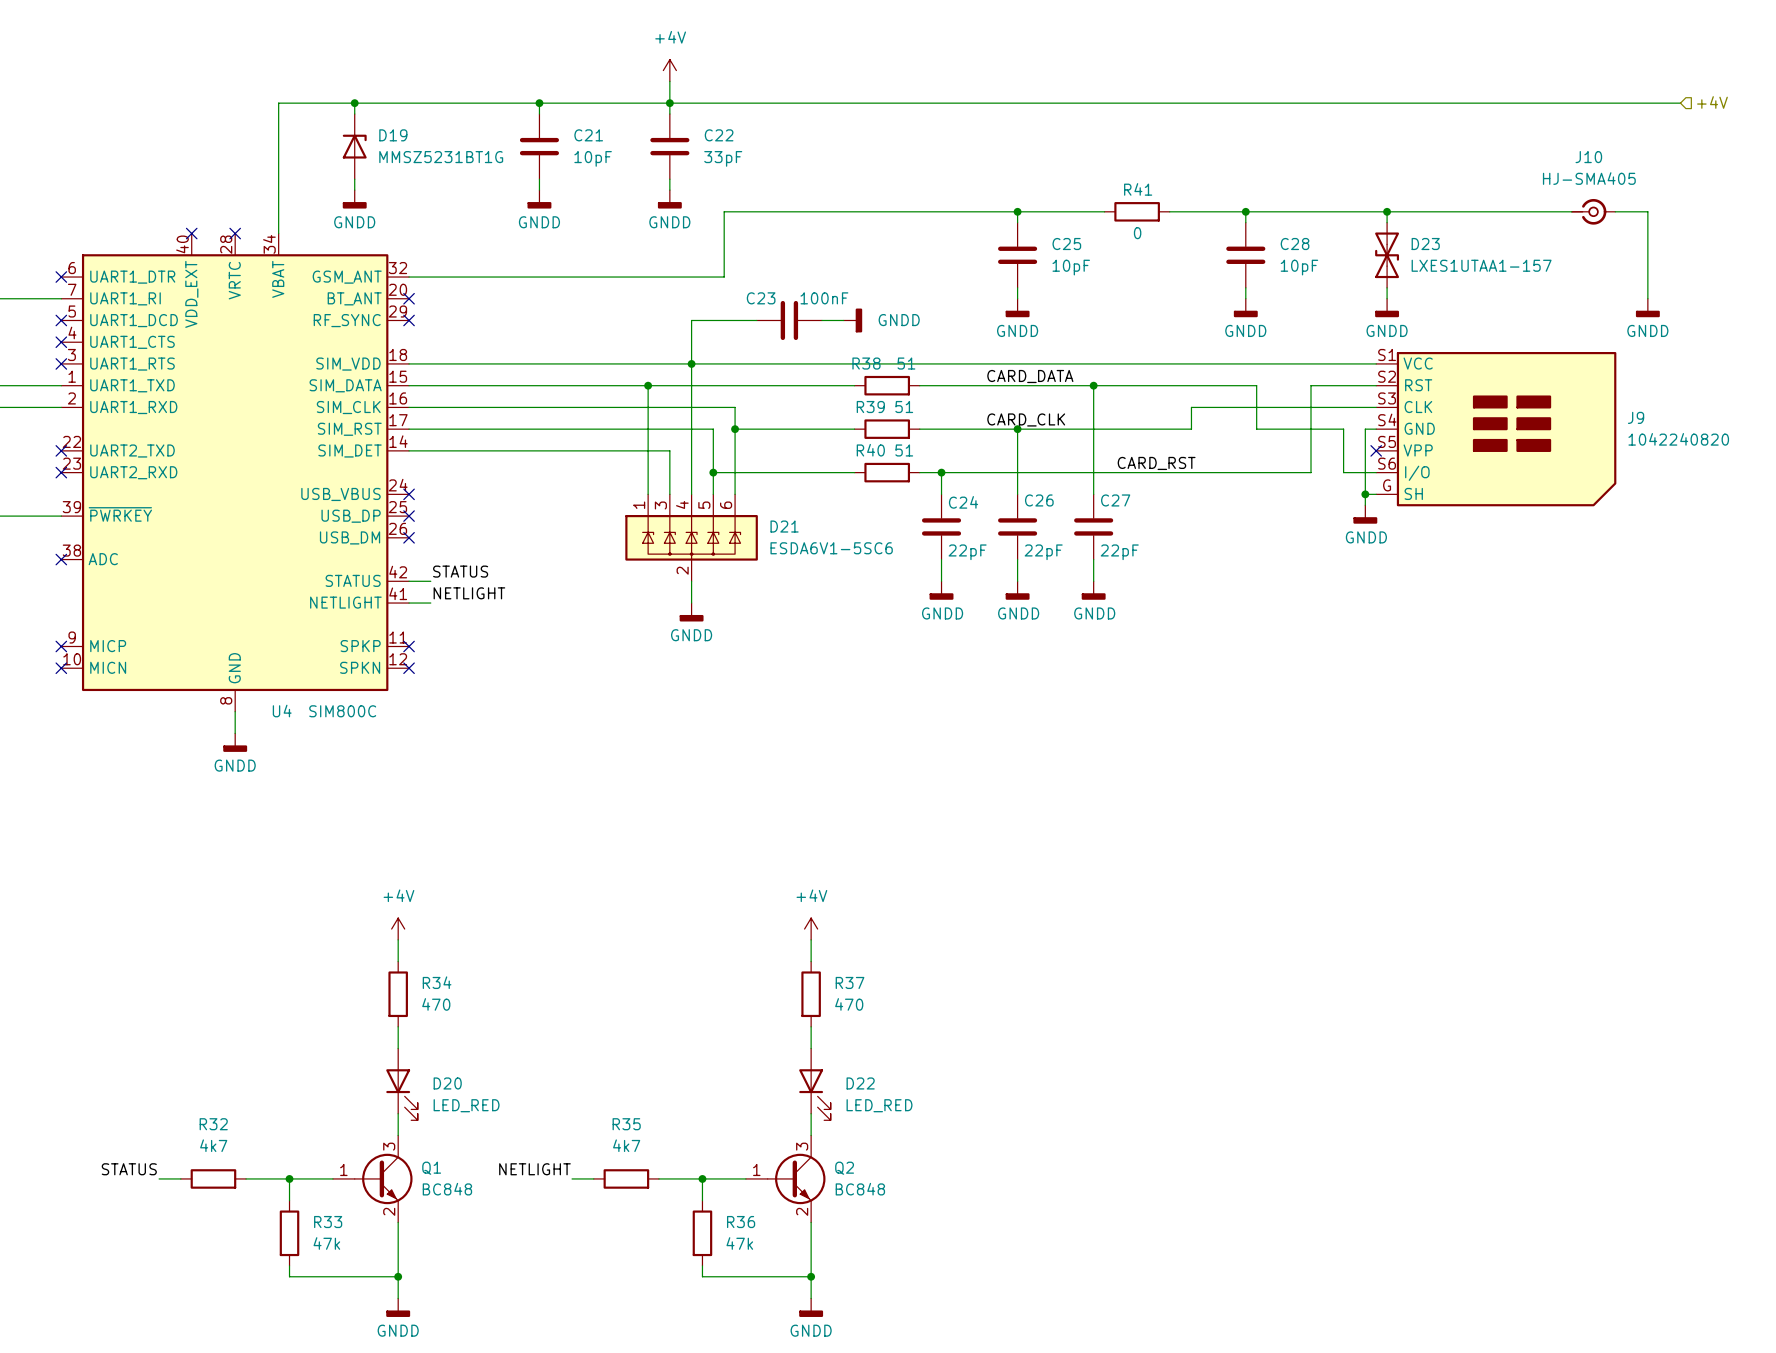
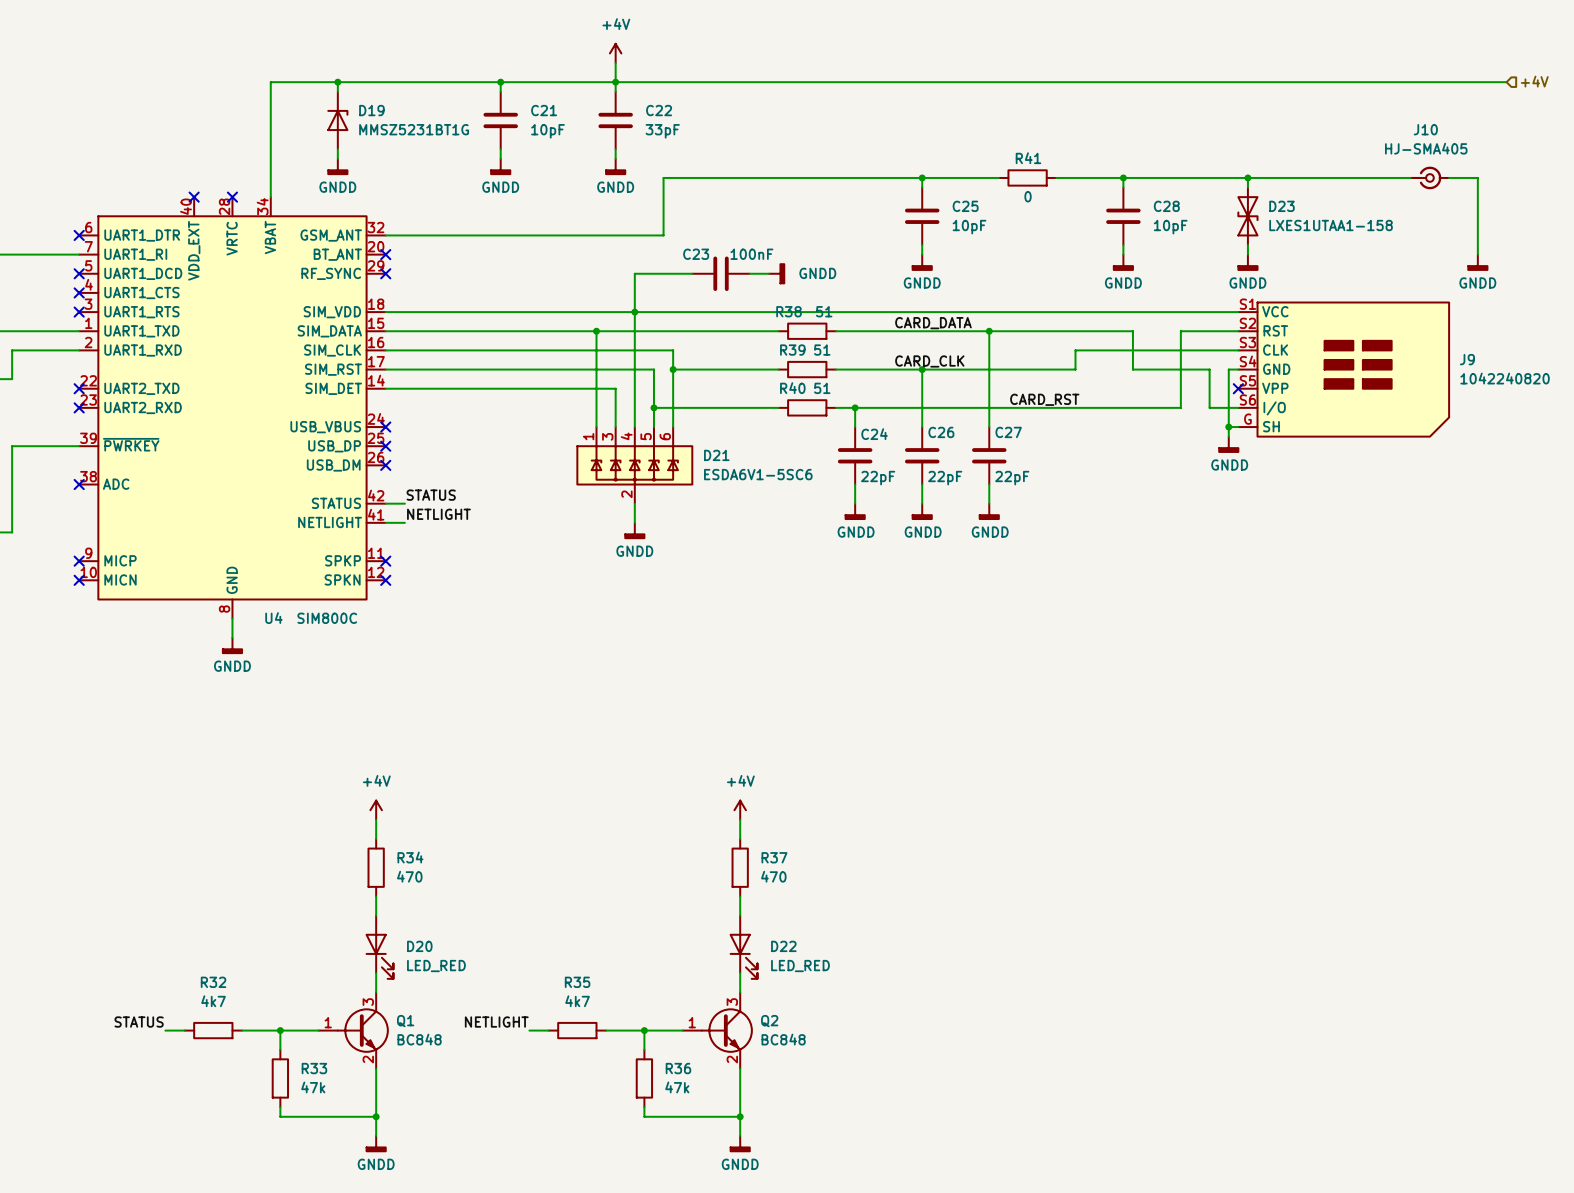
D23 value: LXES1UTAA1-157 (1481, 265) -> LXES1UTAA1-158 (1331, 225)

